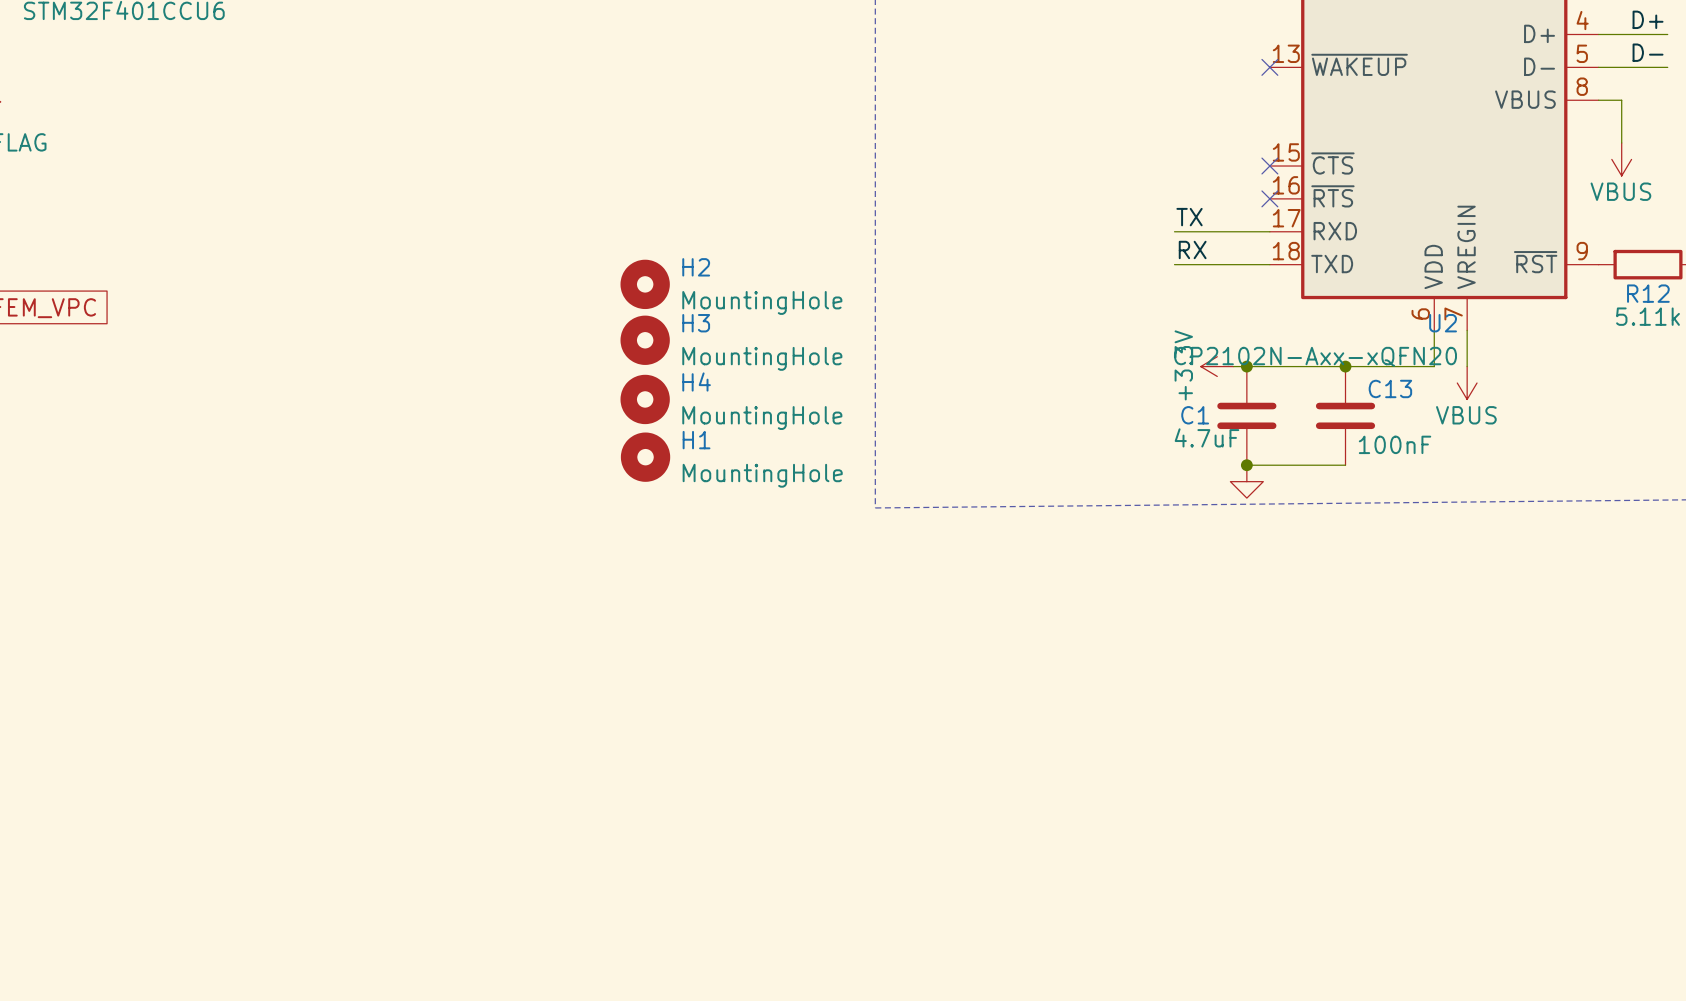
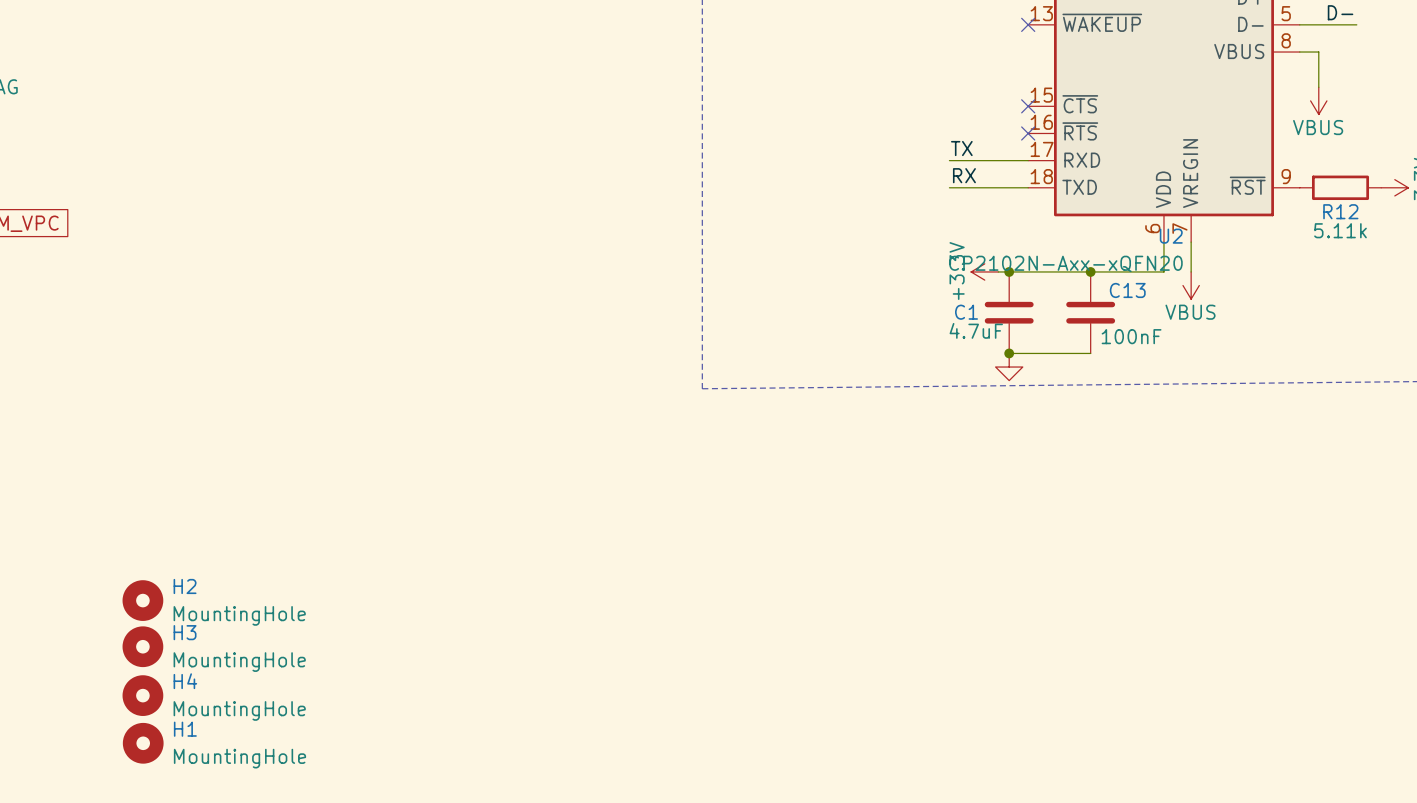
H2 position: (645, 284) -> (142, 600)
H3 position: (645, 340) -> (142, 646)
H4 position: (645, 399) -> (142, 695)
H1 position: (645, 457) -> (143, 743)

